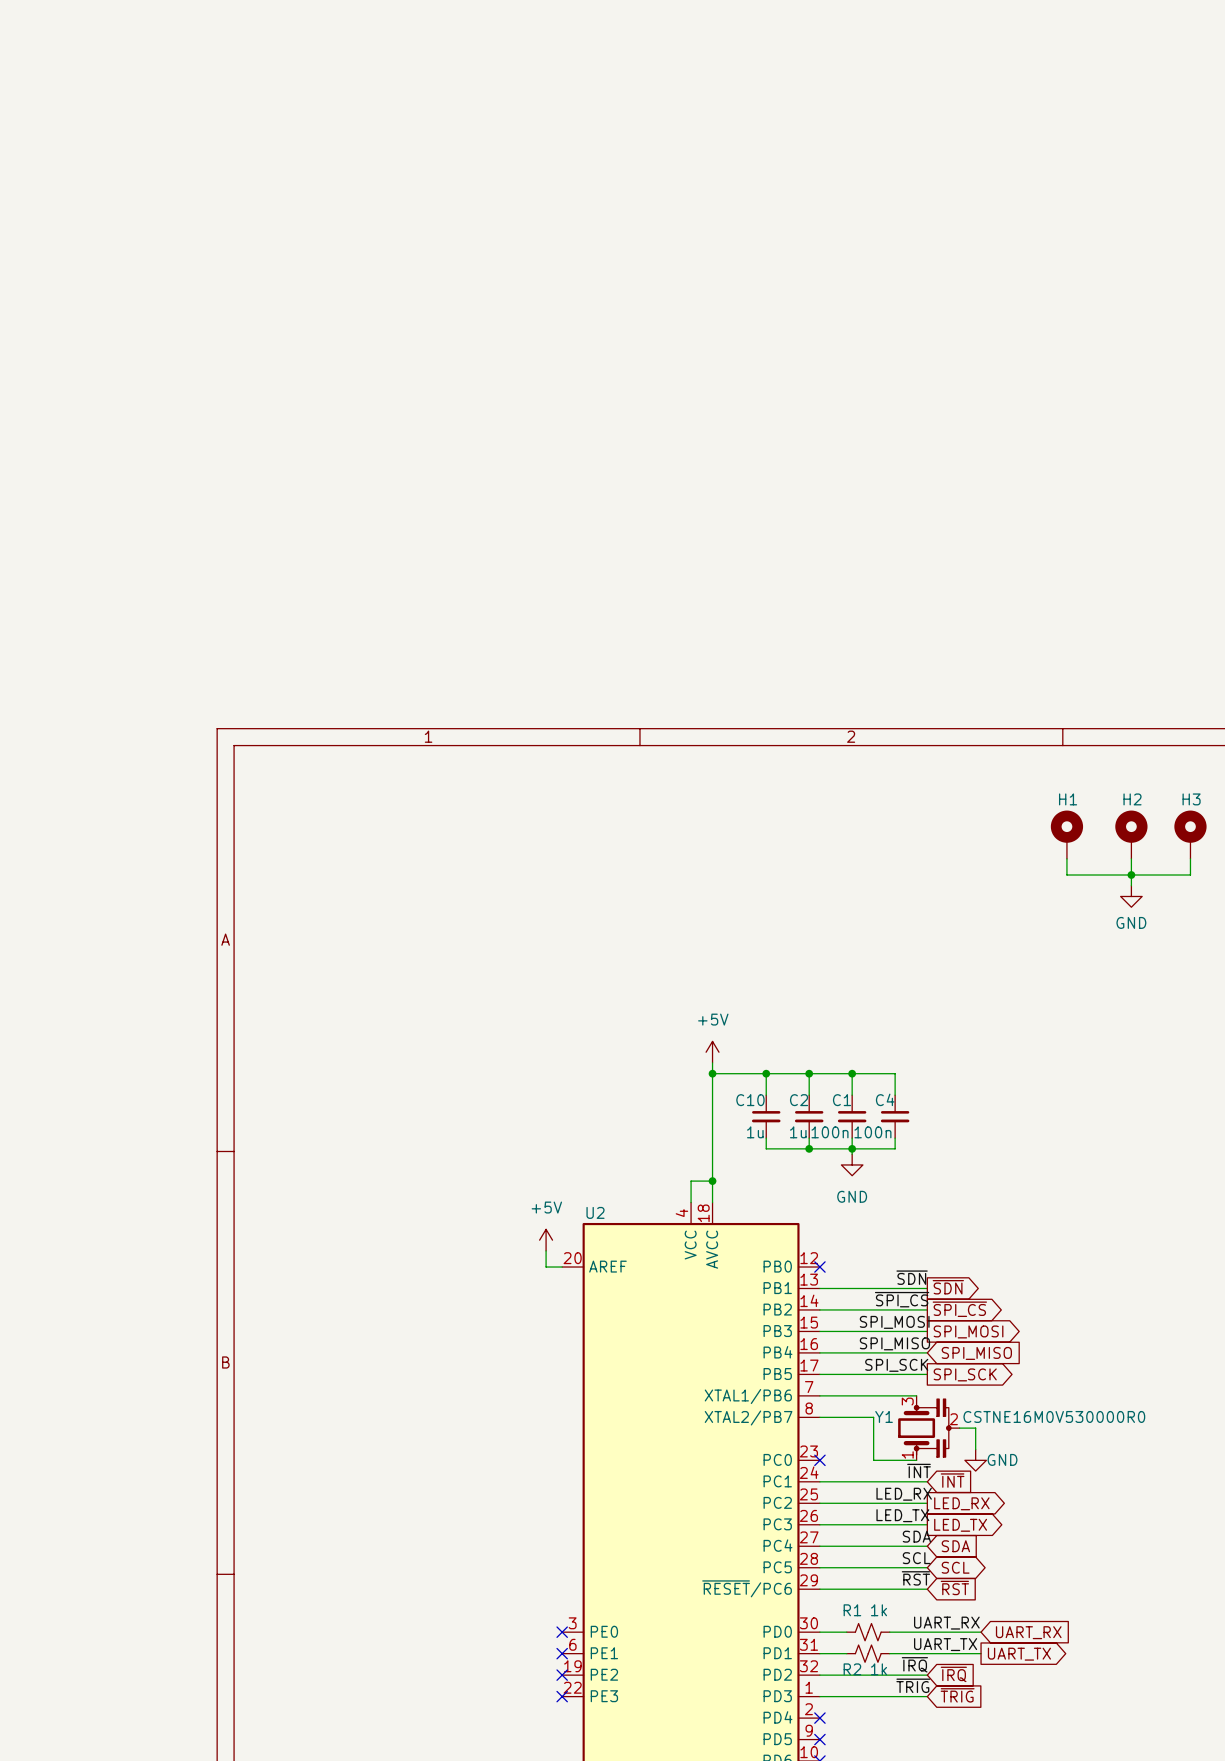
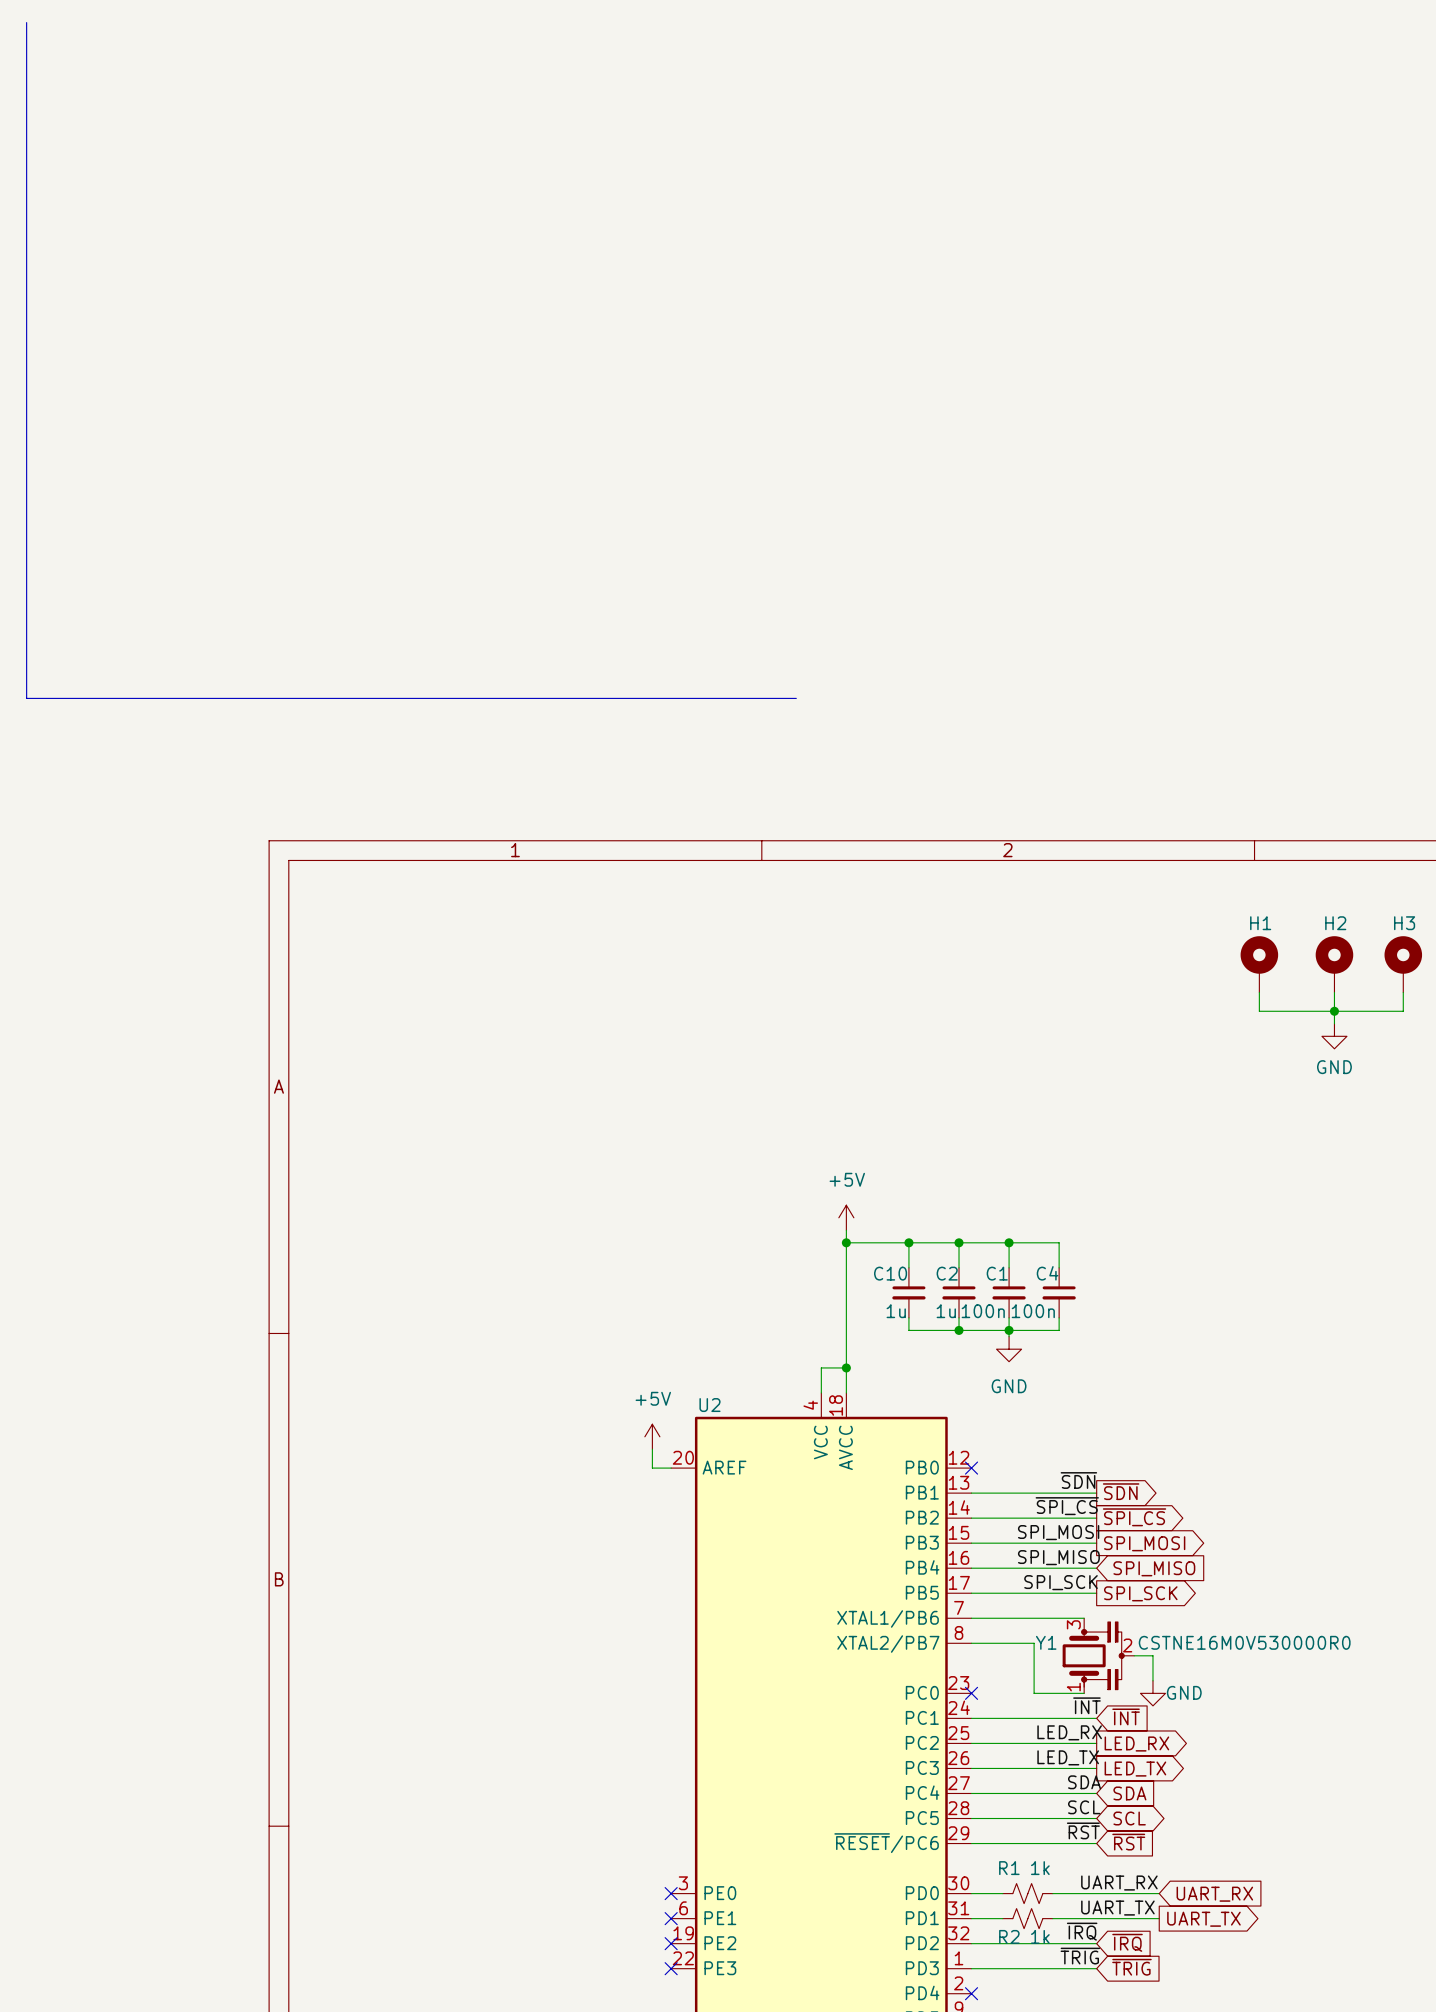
line: none -> (26, 22) (26, 698) (796, 698)

